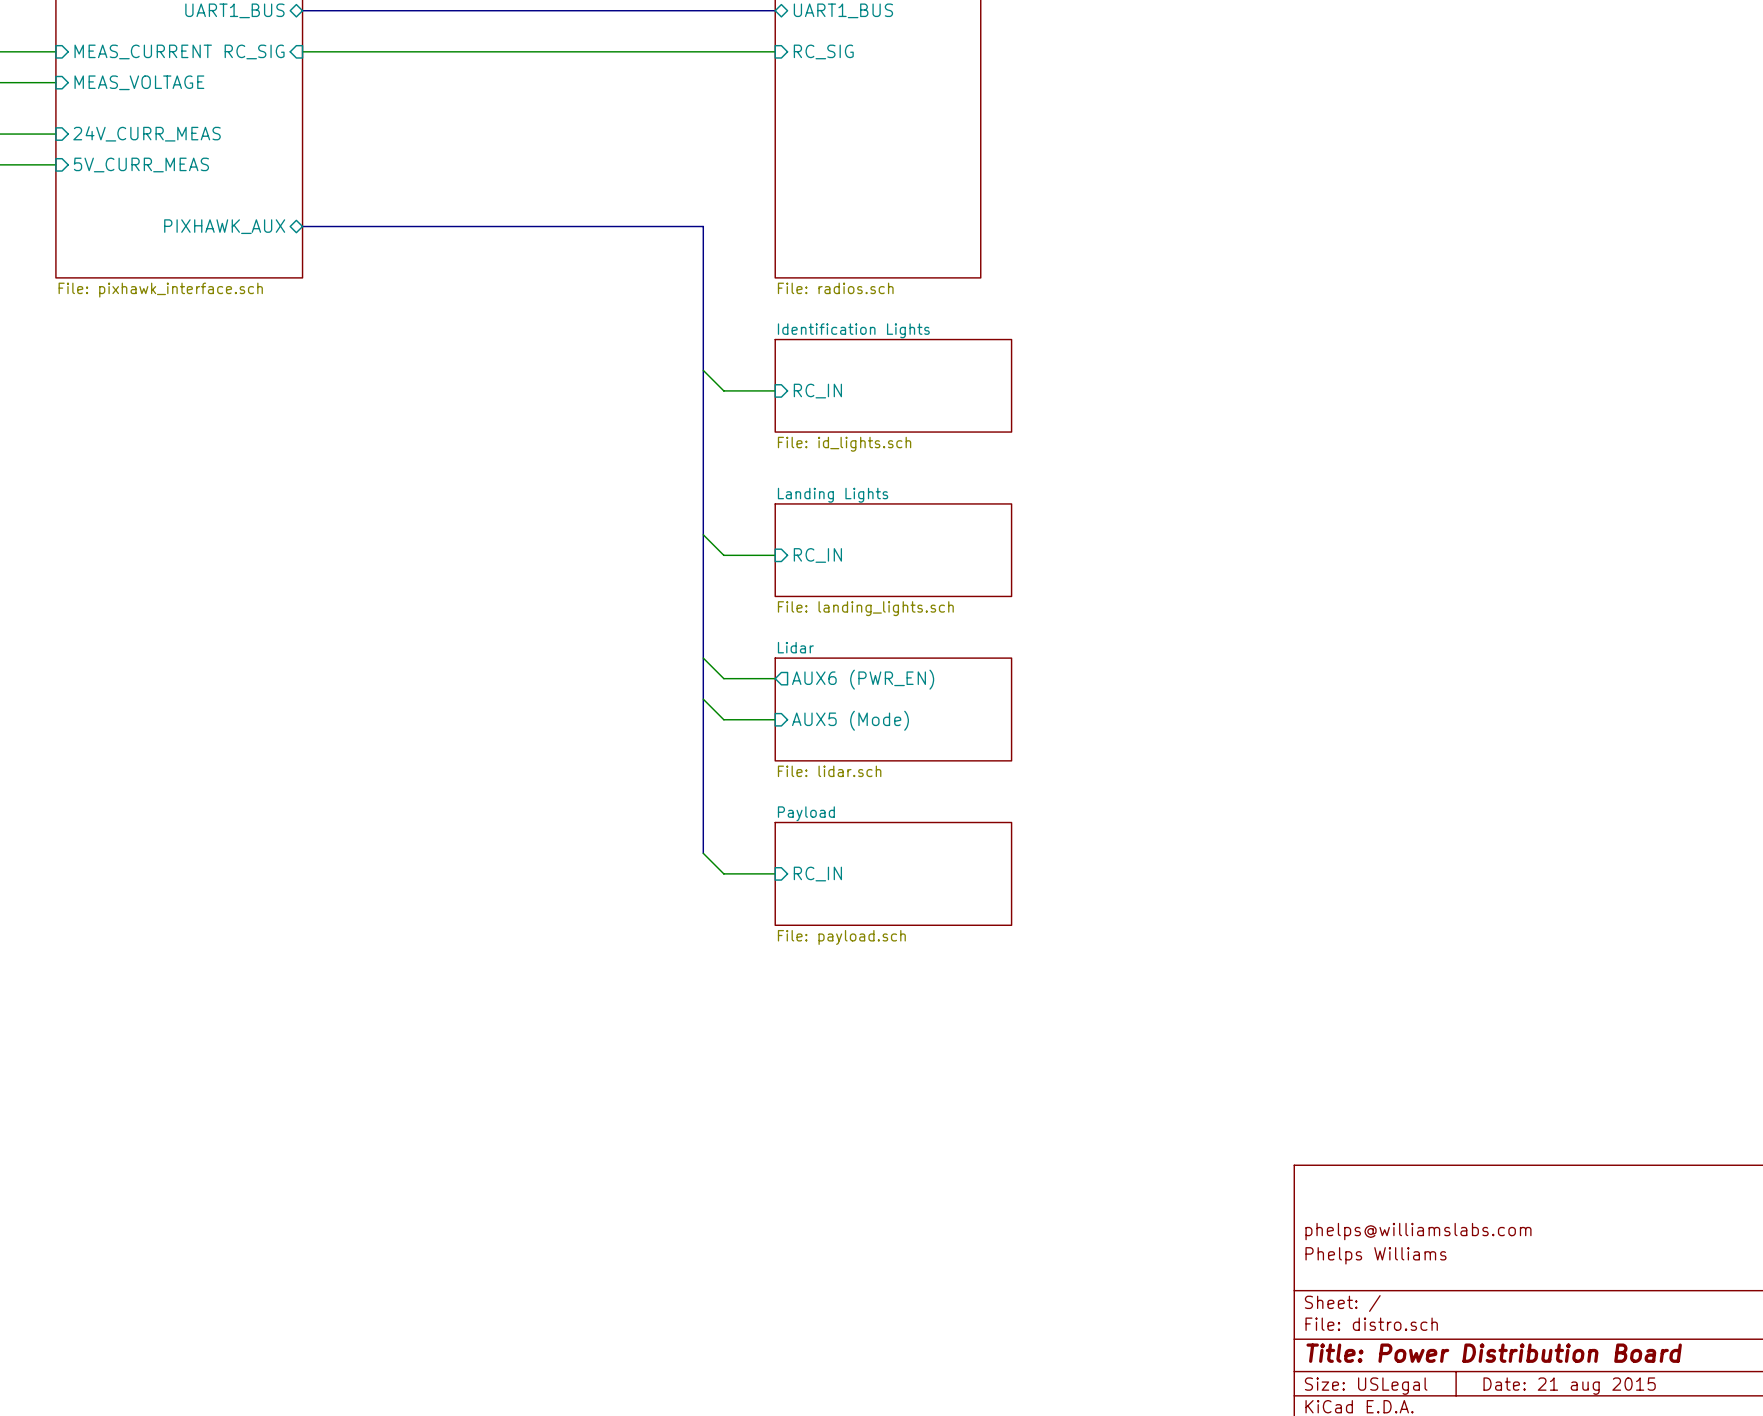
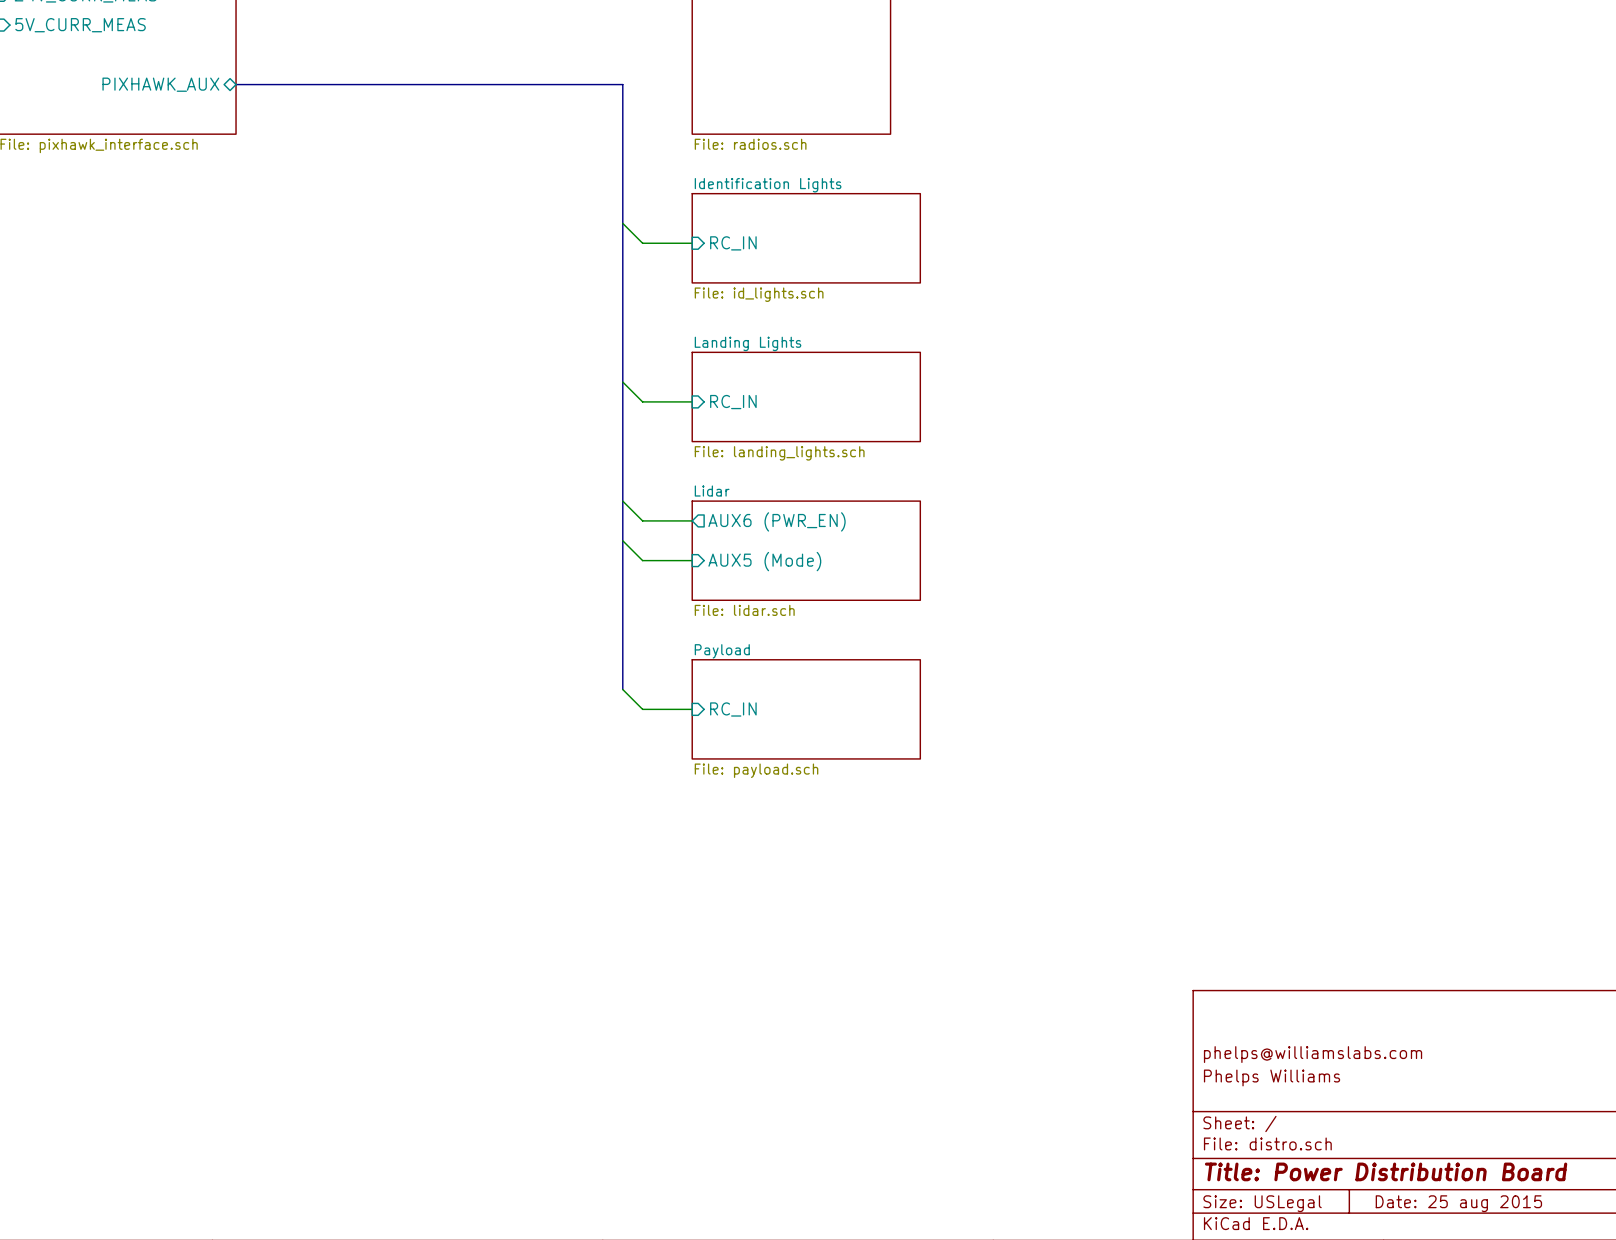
title block: Date: 21 aug 2015 (1569, 1386) -> Date: 25 aug 2015 (1458, 1203)

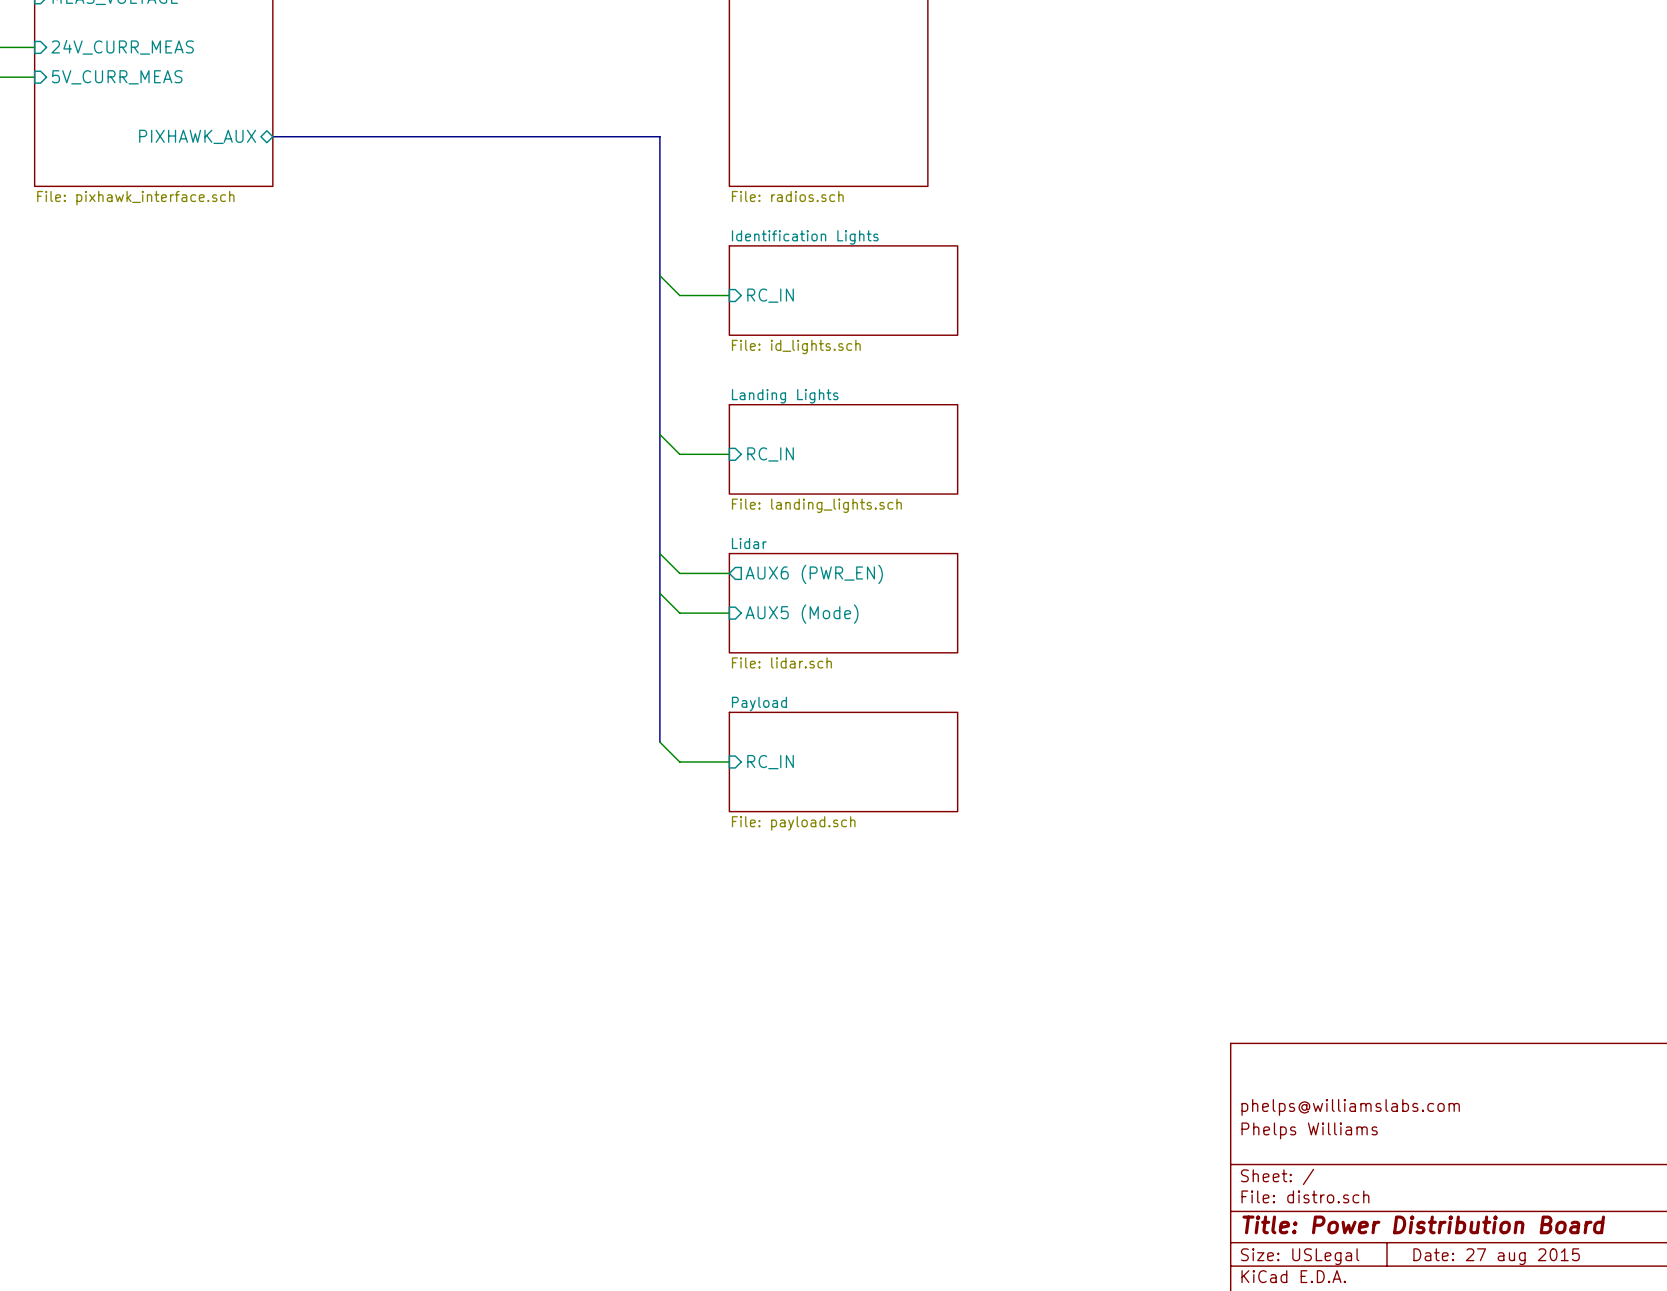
title block: Date: 25 aug 2015 (1458, 1203) -> Date: 27 aug 2015 (1496, 1256)

